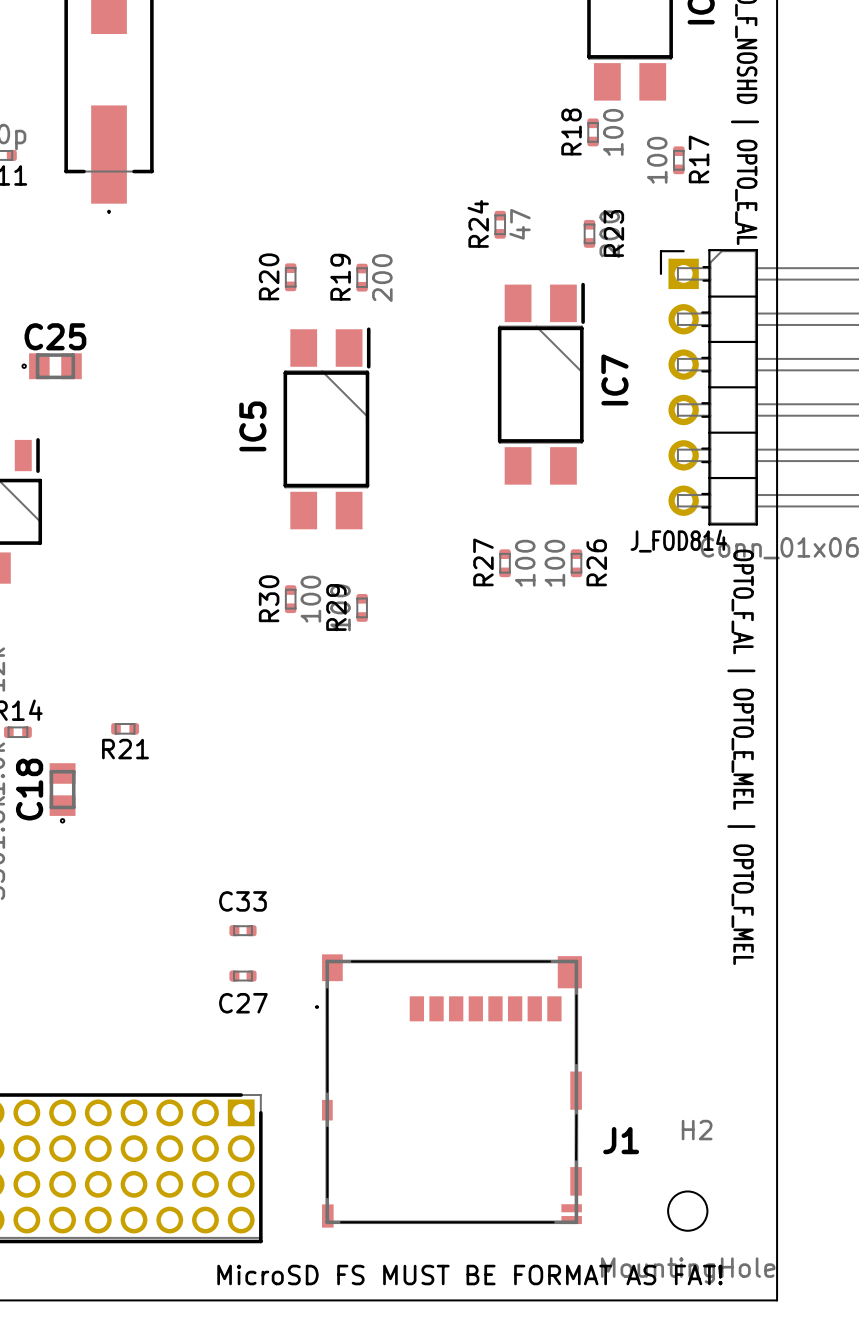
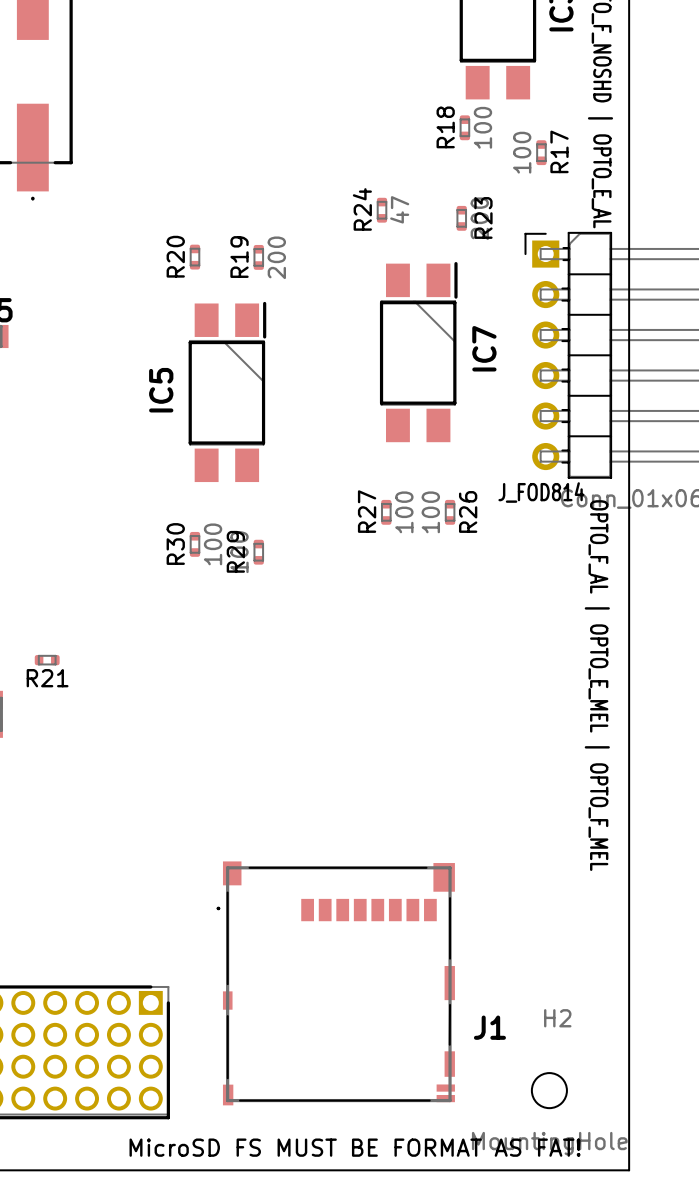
C33: (242, 930) -> none
C27: (242, 976) -> none

